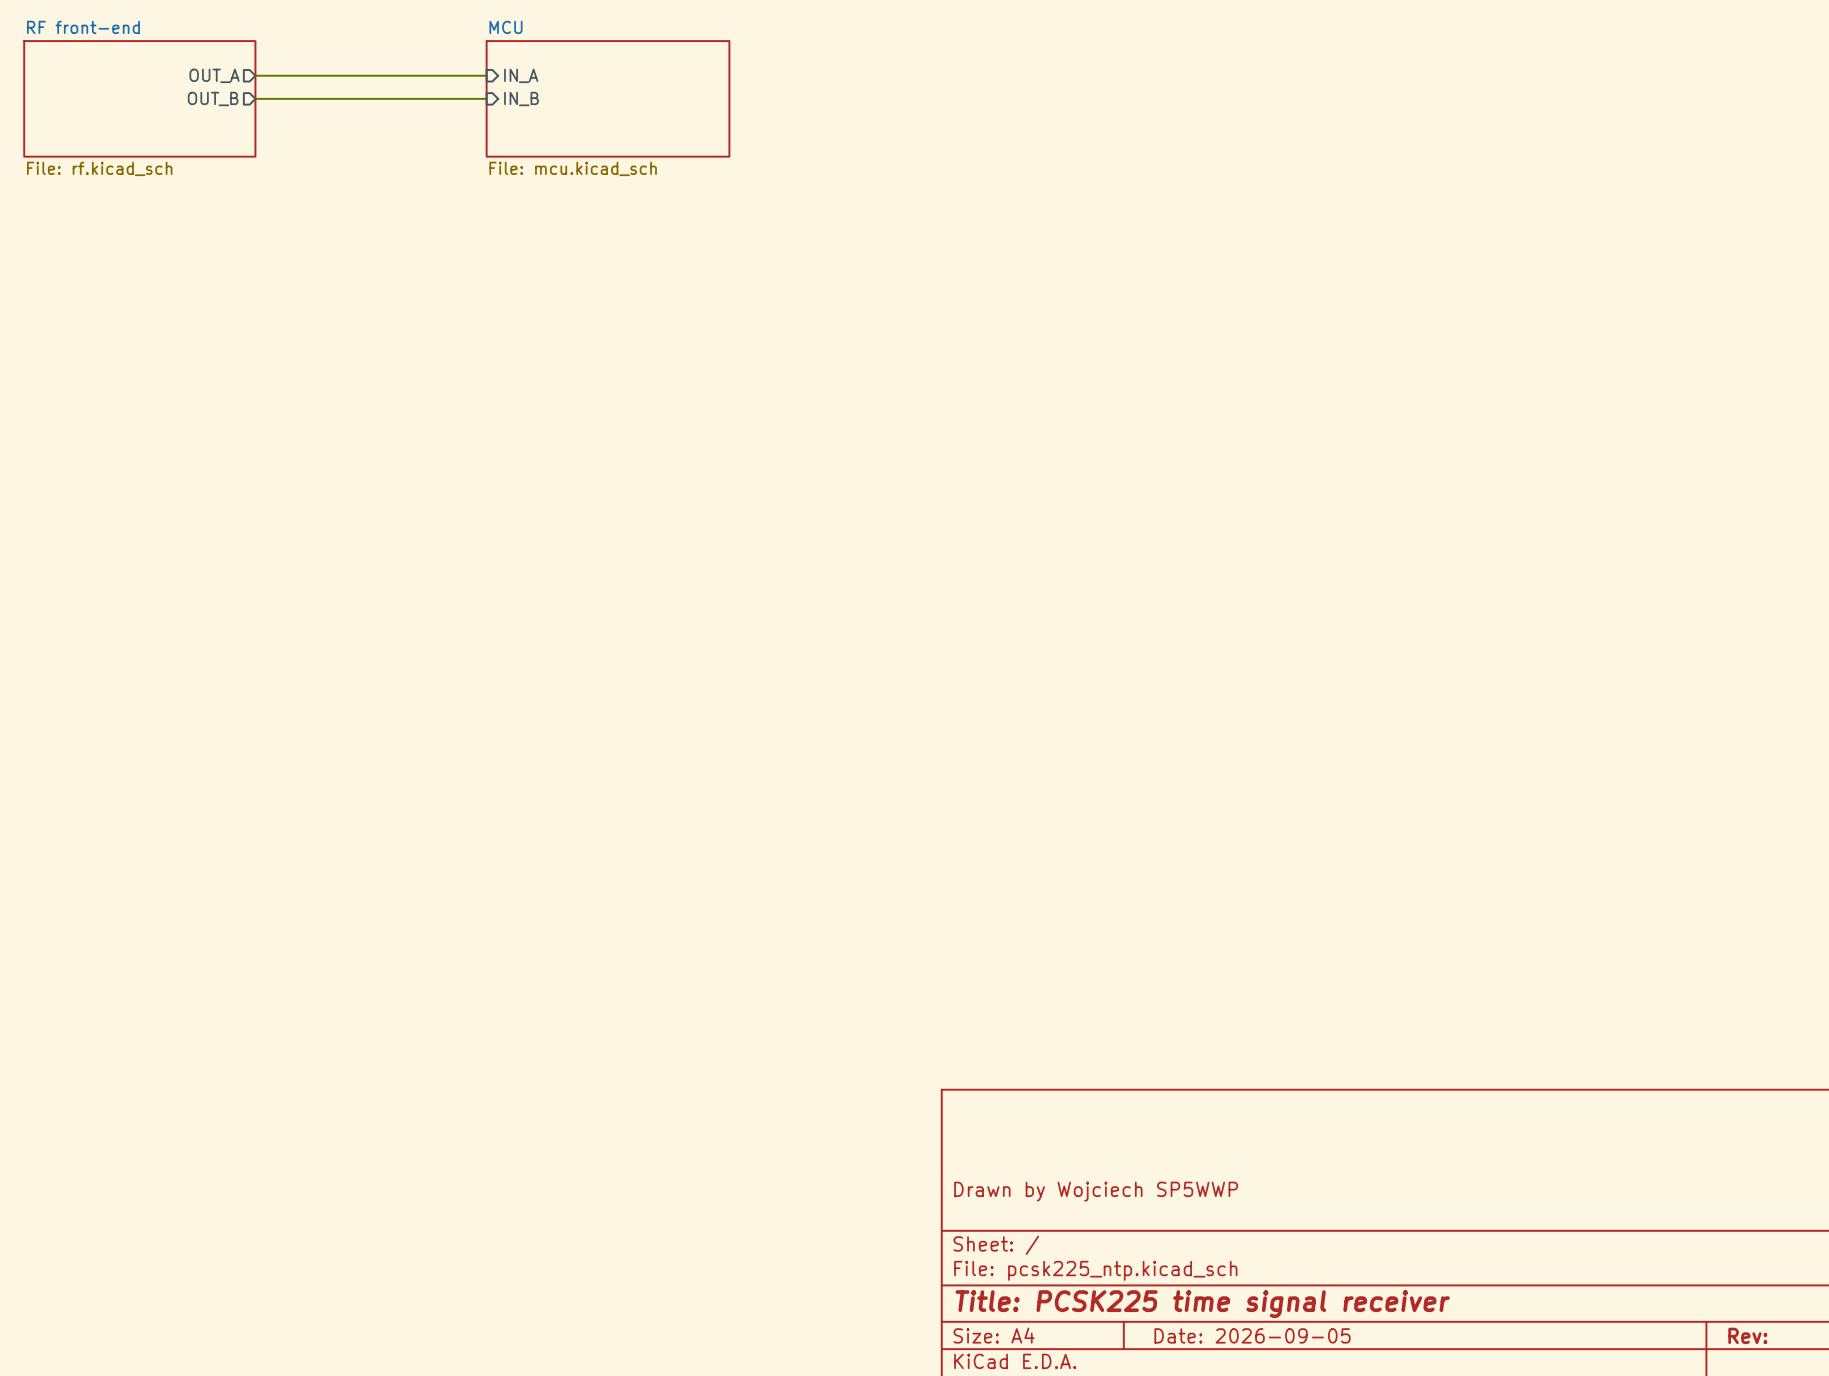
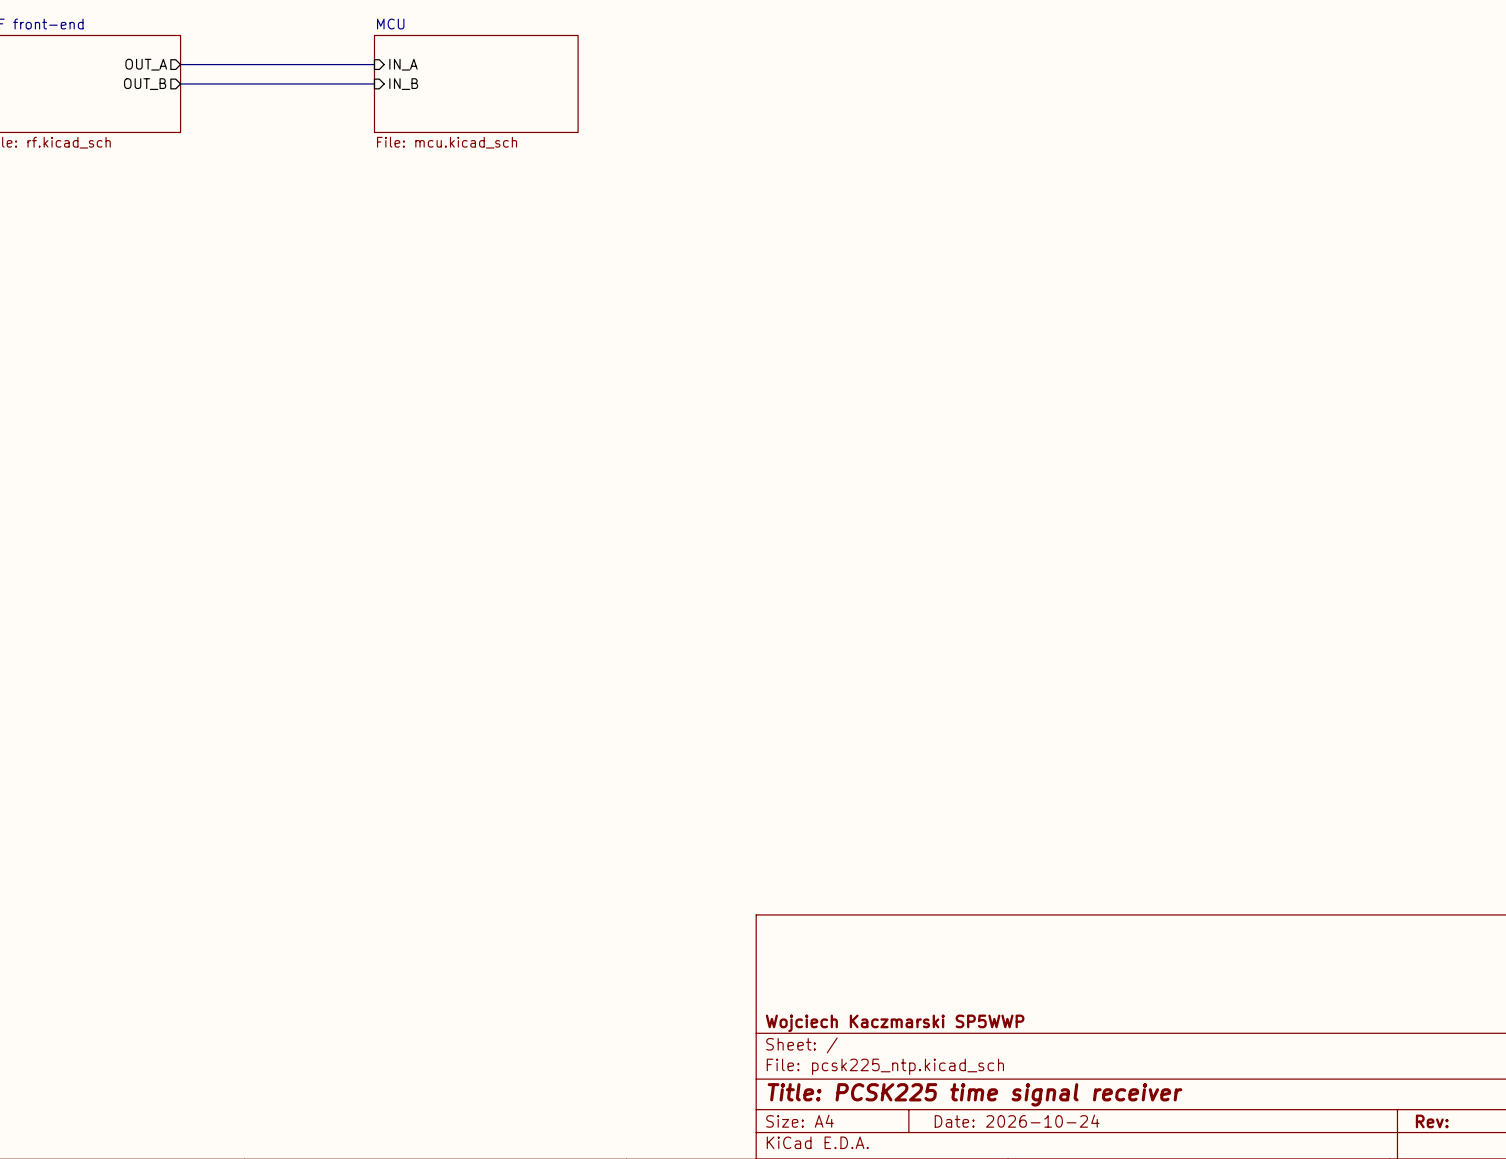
title block: Drawn by Wojciech SP5WWP (1096, 1191) -> none
title block: none -> Wojciech Kaczmarski SP5WWP (895, 1023)
title block: Date: 2026-09-05 (1252, 1335) -> Date: 2026-10-24 (1017, 1121)

